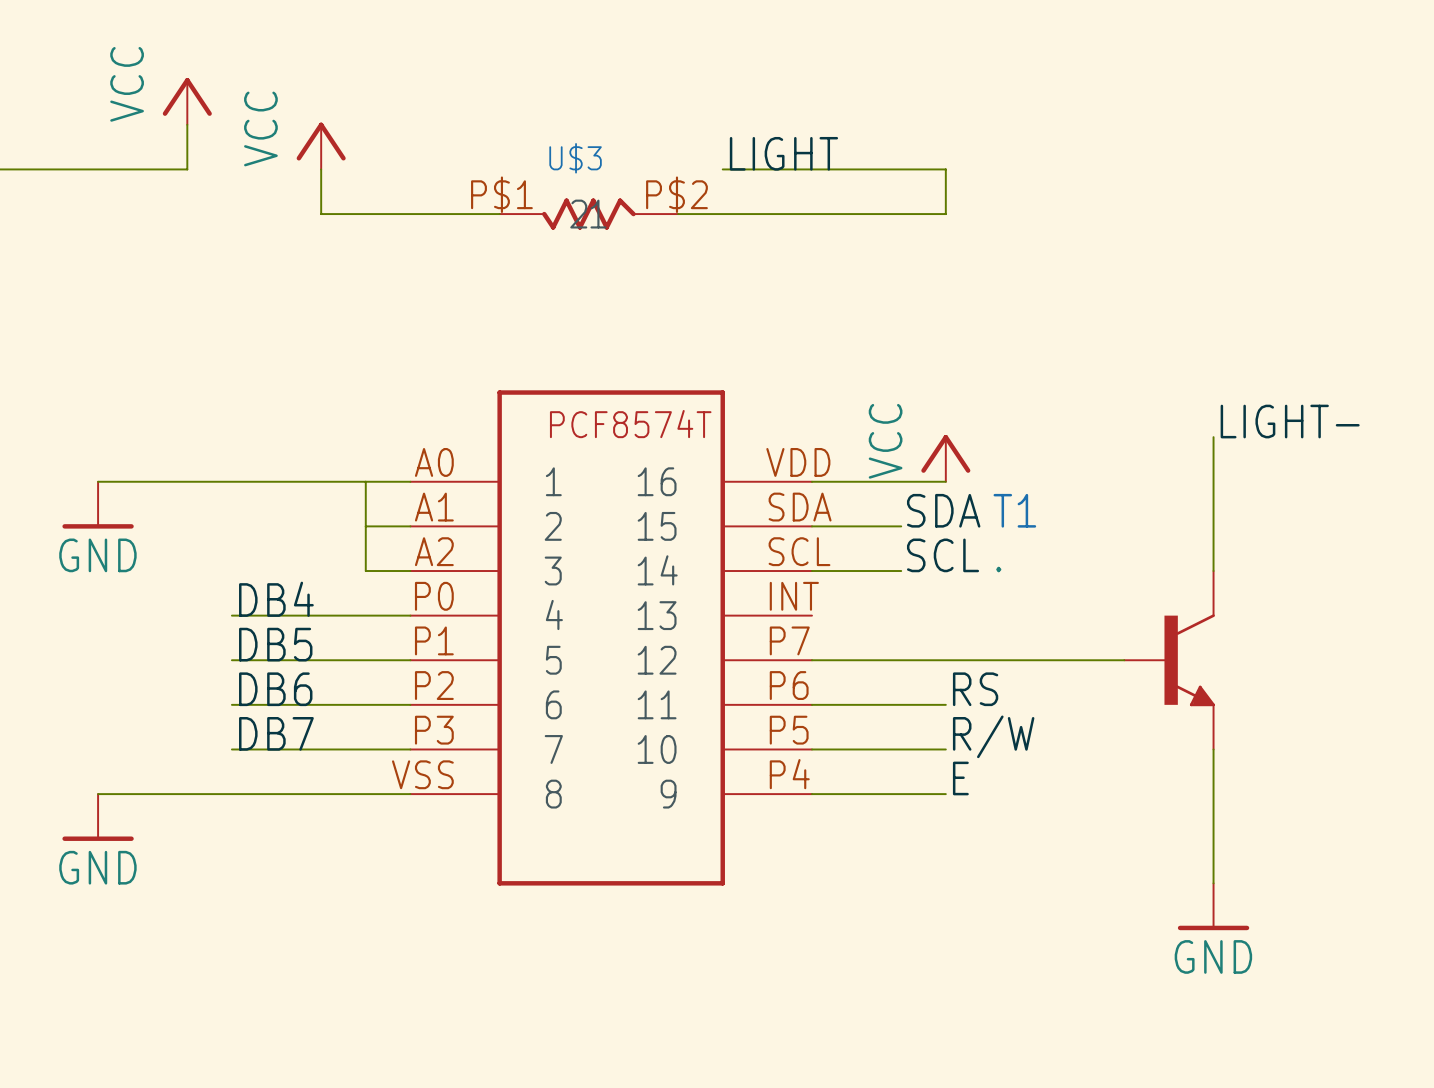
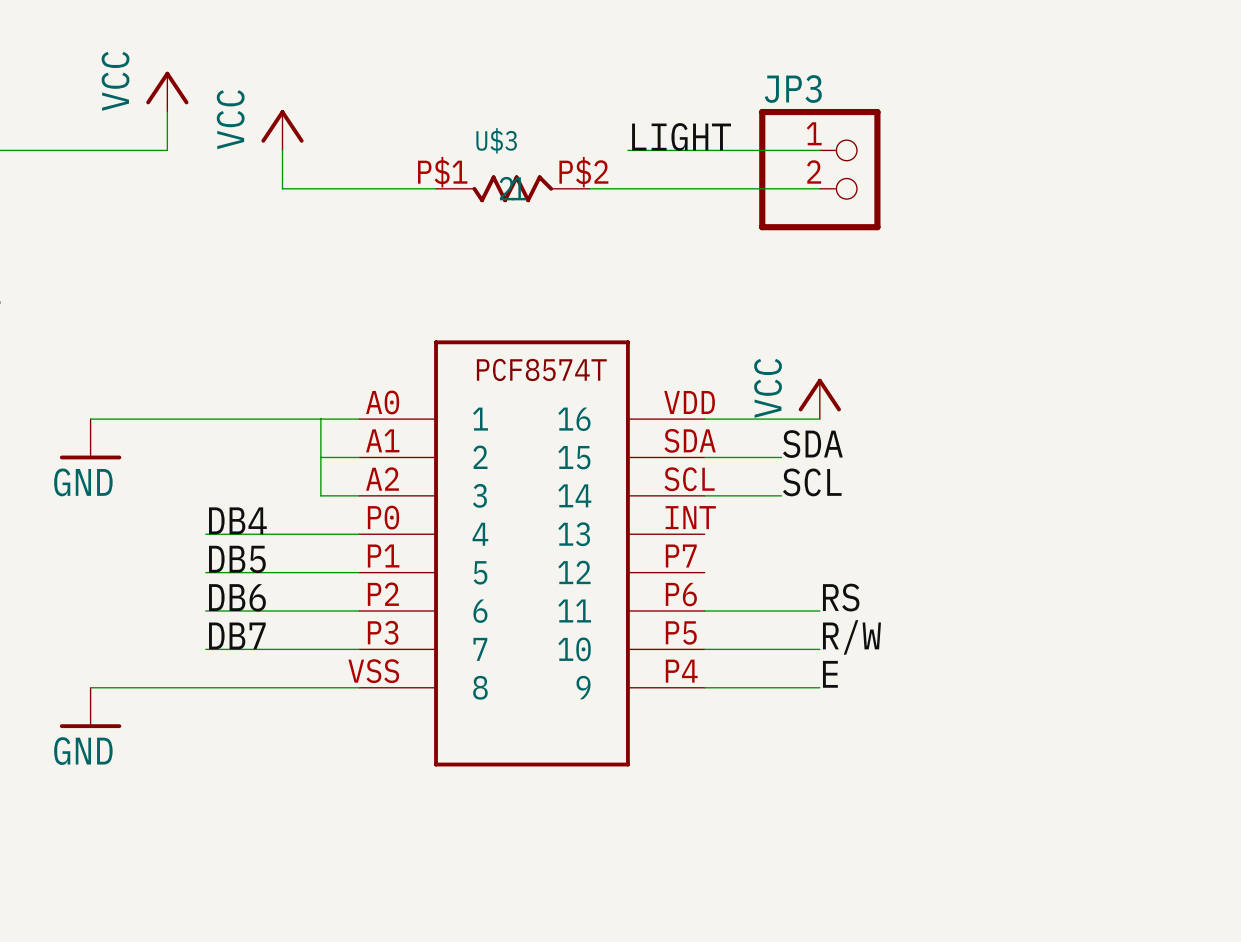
wire: (945, 169) (945, 214) -> none
JP3: none -> (819, 169)
label: LIGHT- (1290, 421) -> none
wire: (1213, 437) (1213, 571) -> none
wire: (811, 660) (1124, 660) -> none
T1: . (1169, 660) -> none
wire: (1213, 749) (1213, 883) -> none
power symbol: GND (1213, 906) -> none

